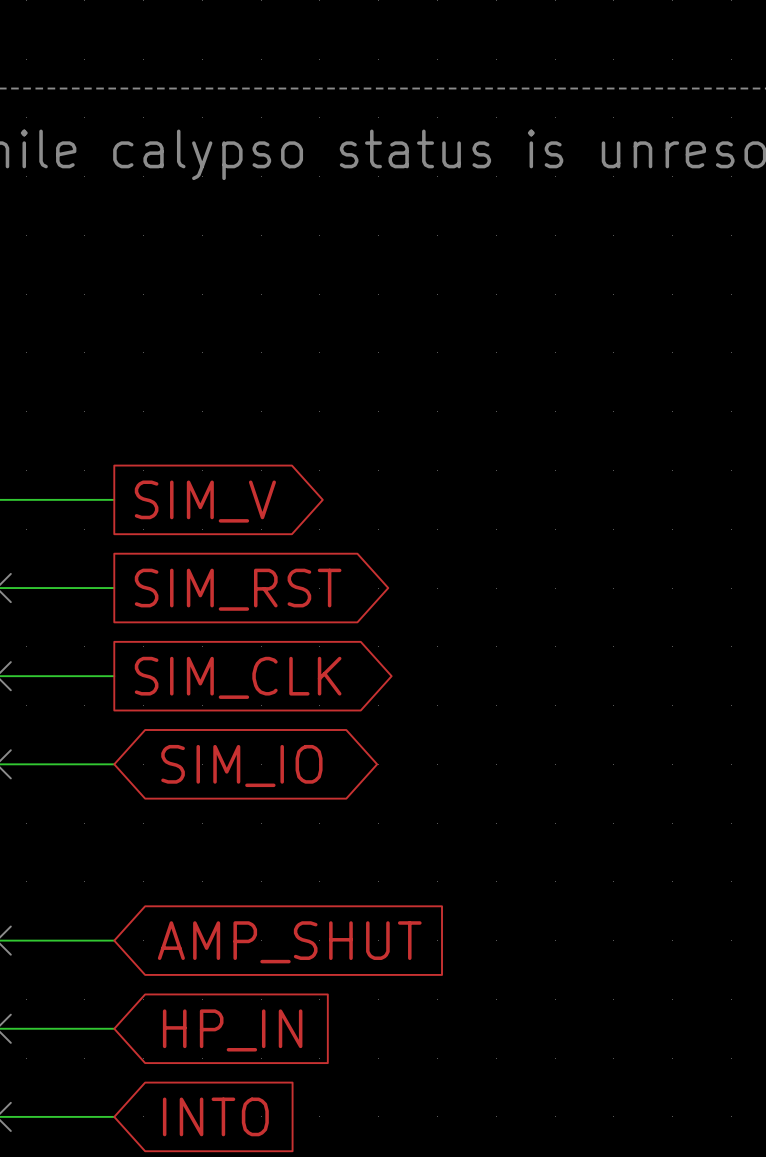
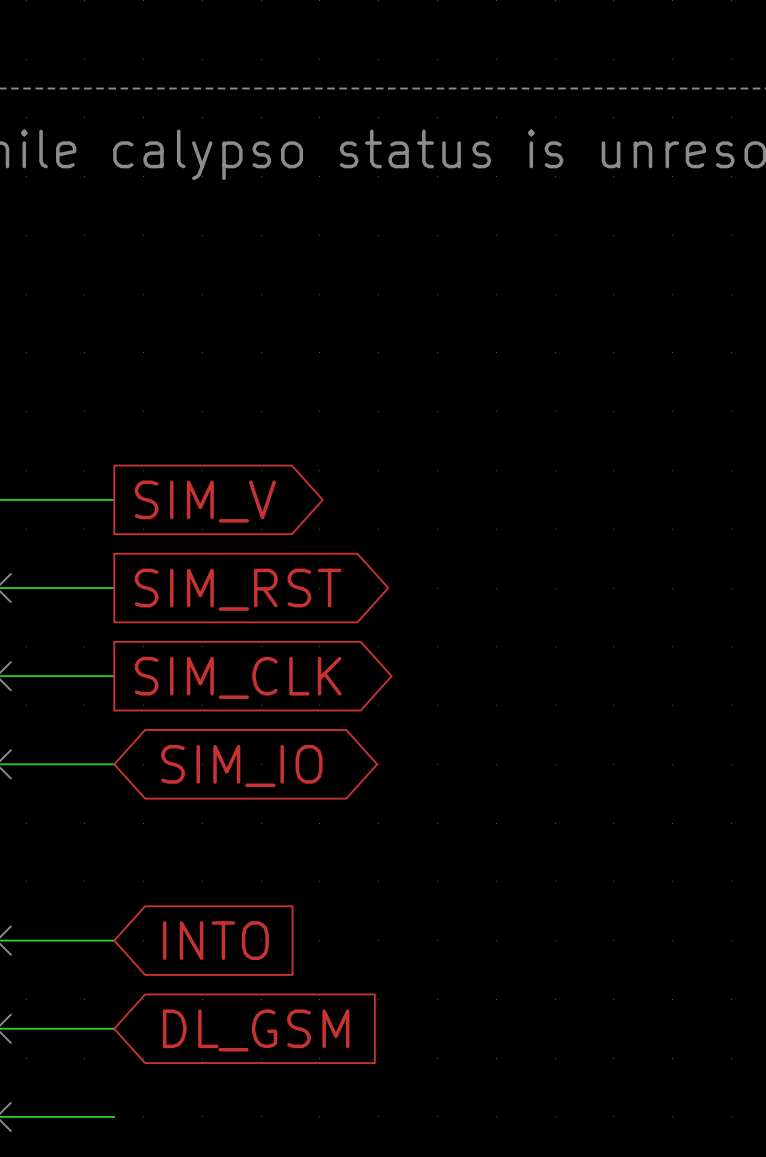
global label: AMP_SHUT (289, 942) -> INTO (215, 940)
global label: HP_IN (232, 1030) -> DL_GSM (256, 1030)
global label: INTO (215, 1116) -> none

